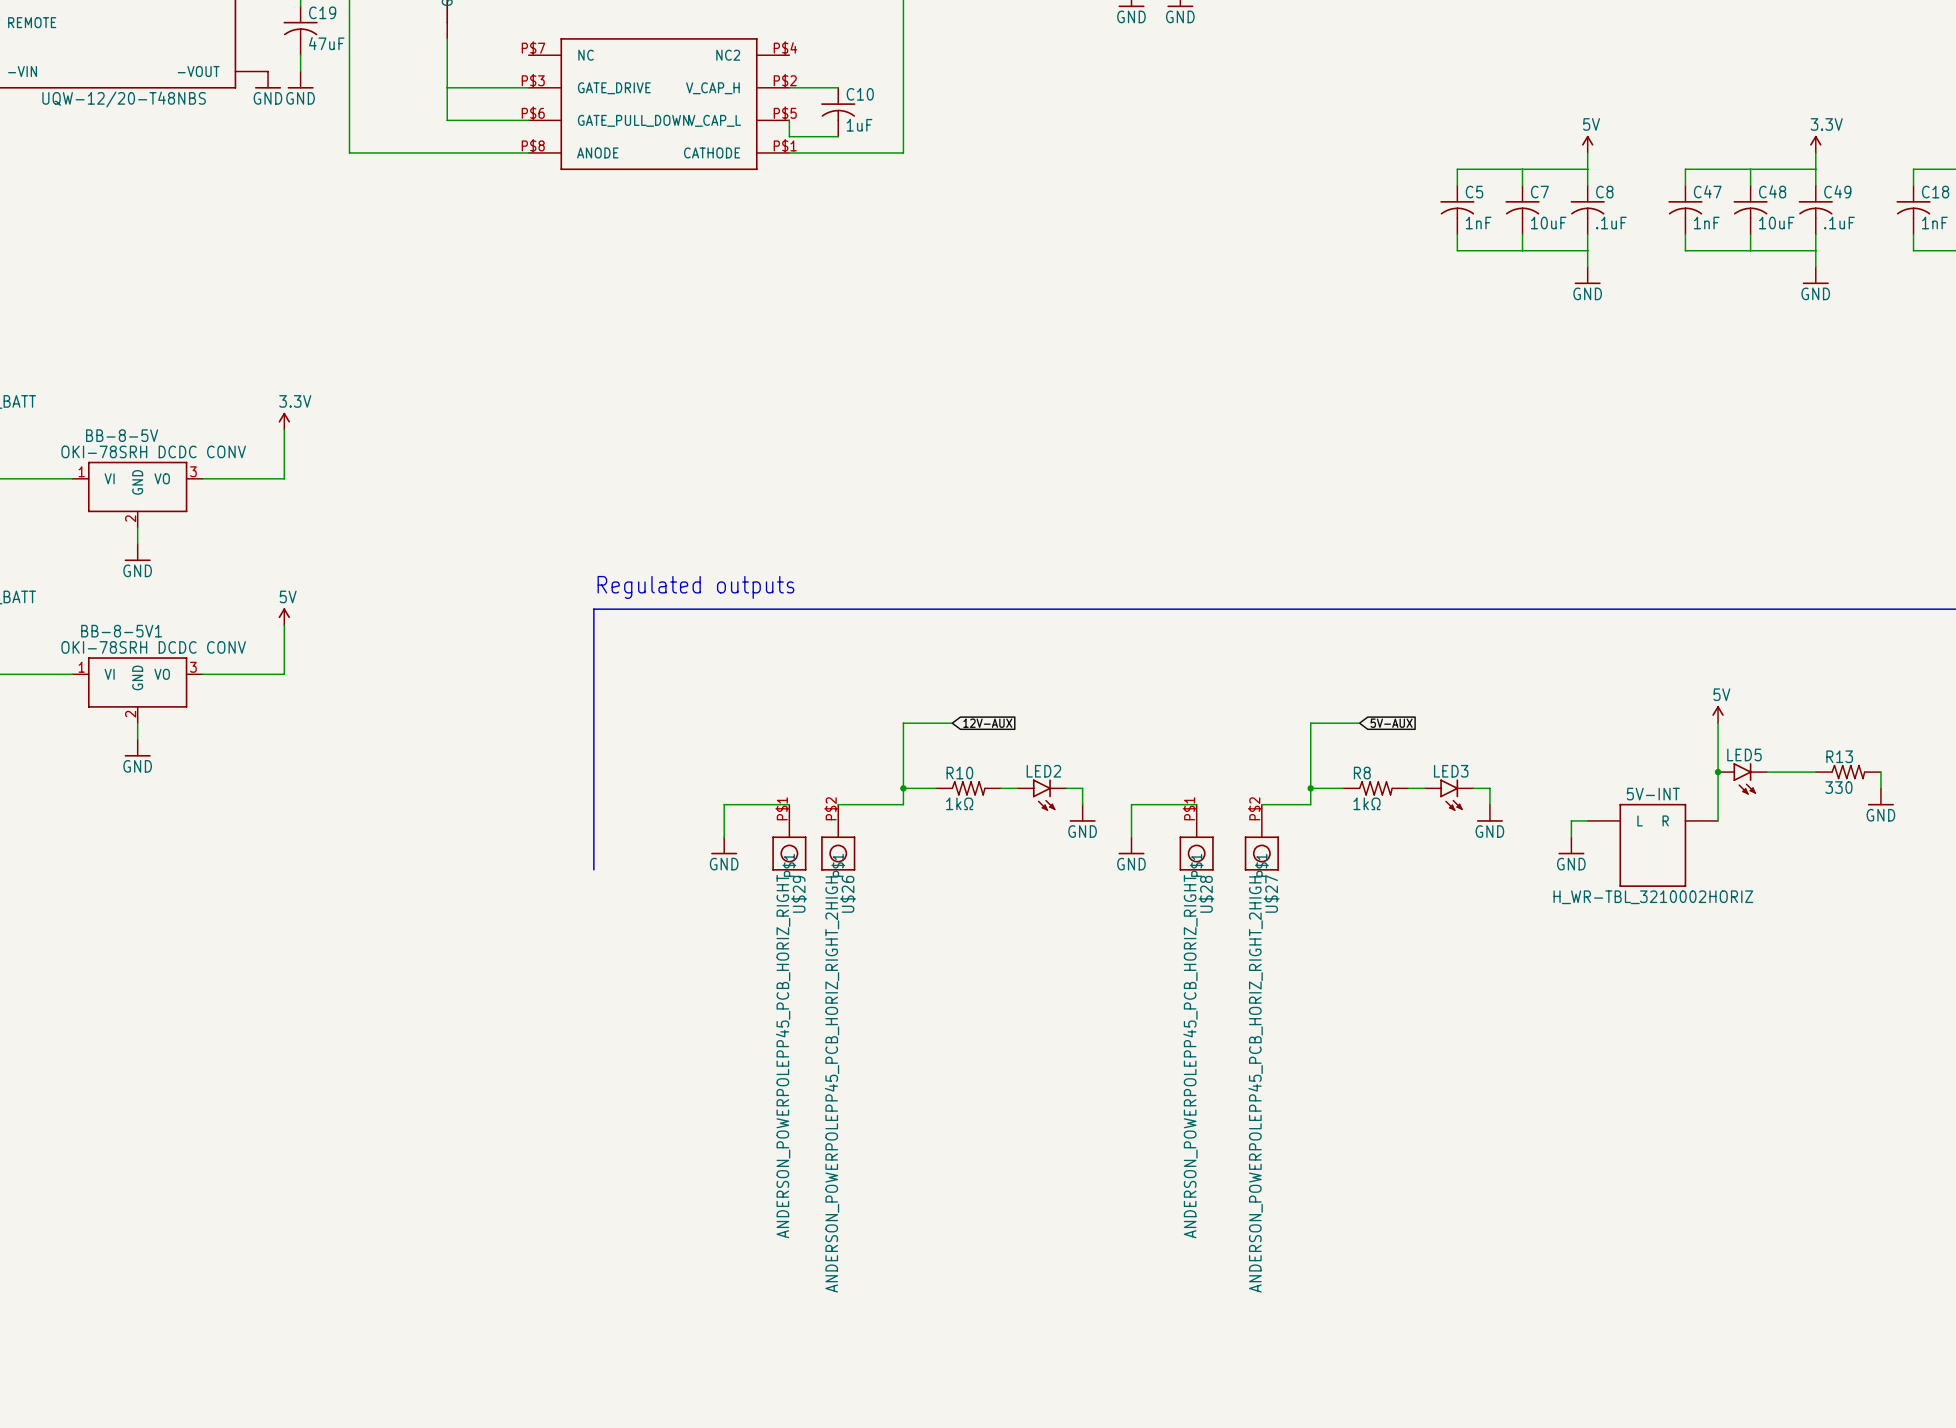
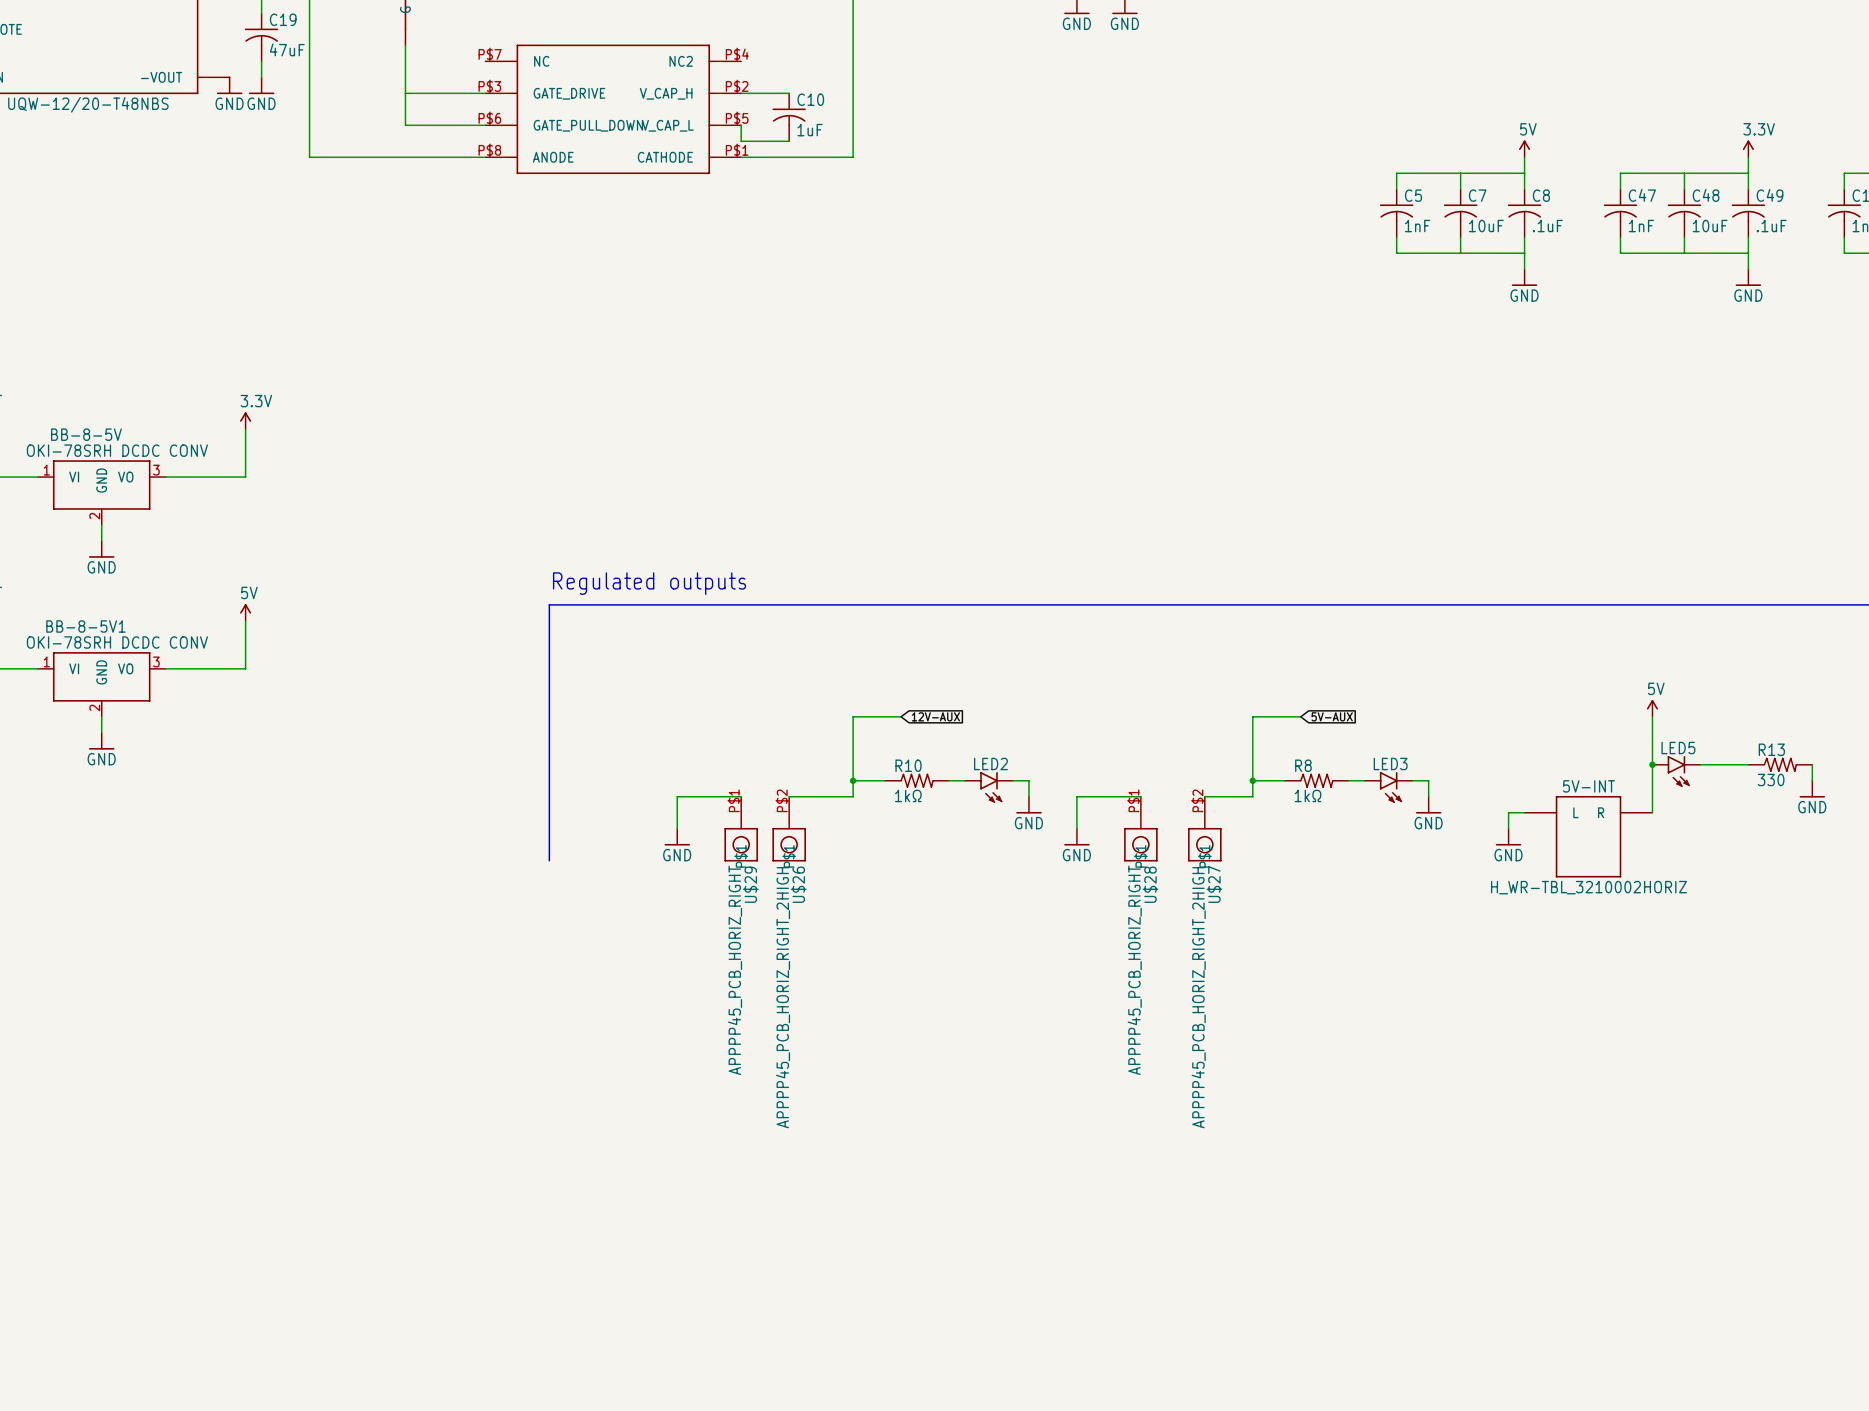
U$29 value: ANDERSON_POWERPOLEPP45_PCB_HORIZ_RIGHT (783, 1056) -> APPPP45_PCB_HORIZ_RIGHT (735, 970)
U$28 value: ANDERSON_POWERPOLEPP45_PCB_HORIZ_RIGHT (1190, 1056) -> APPPP45_PCB_HORIZ_RIGHT (1134, 970)
U$26 value: ANDERSON_POWERPOLEPP45_PCB_HORIZ_RIGHT_2HIGH (832, 1084) -> APPPP45_PCB_HORIZ_RIGHT_2HIGH (783, 997)
U$27 value: ANDERSON_POWERPOLEPP45_PCB_HORIZ_RIGHT_2HIGH (1255, 1084) -> APPPP45_PCB_HORIZ_RIGHT_2HIGH (1198, 997)

